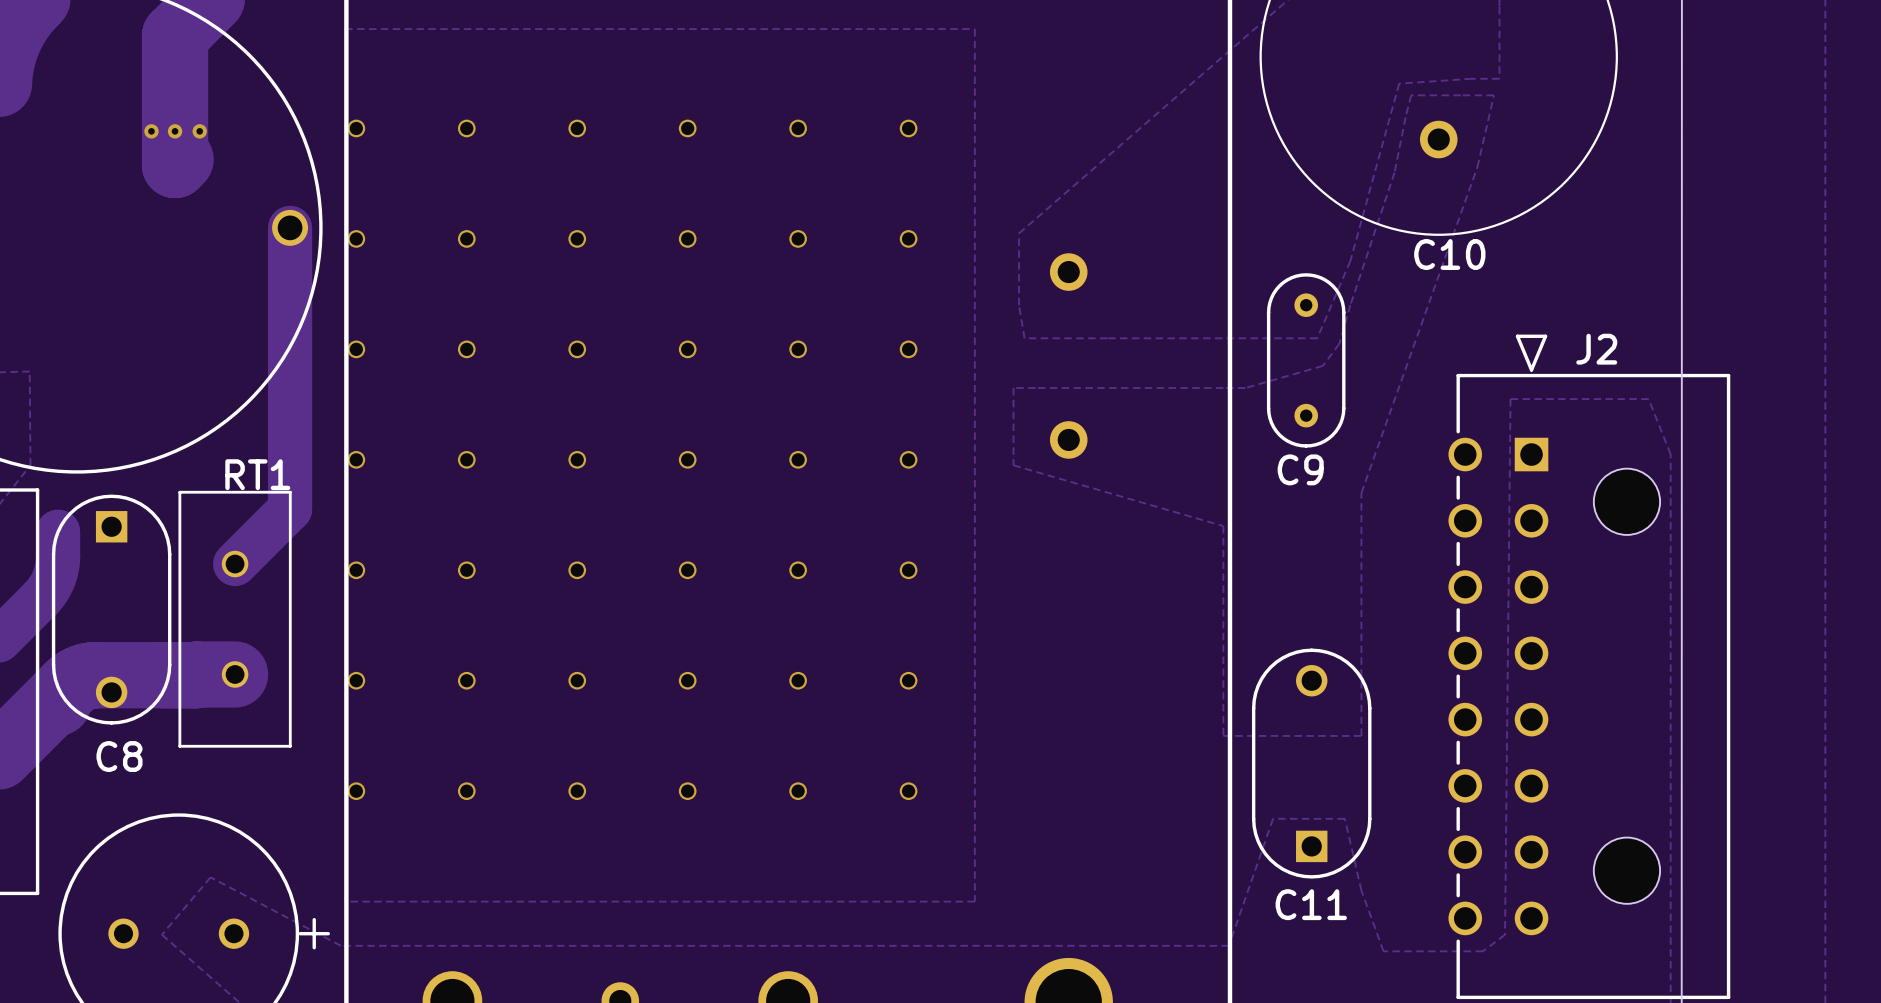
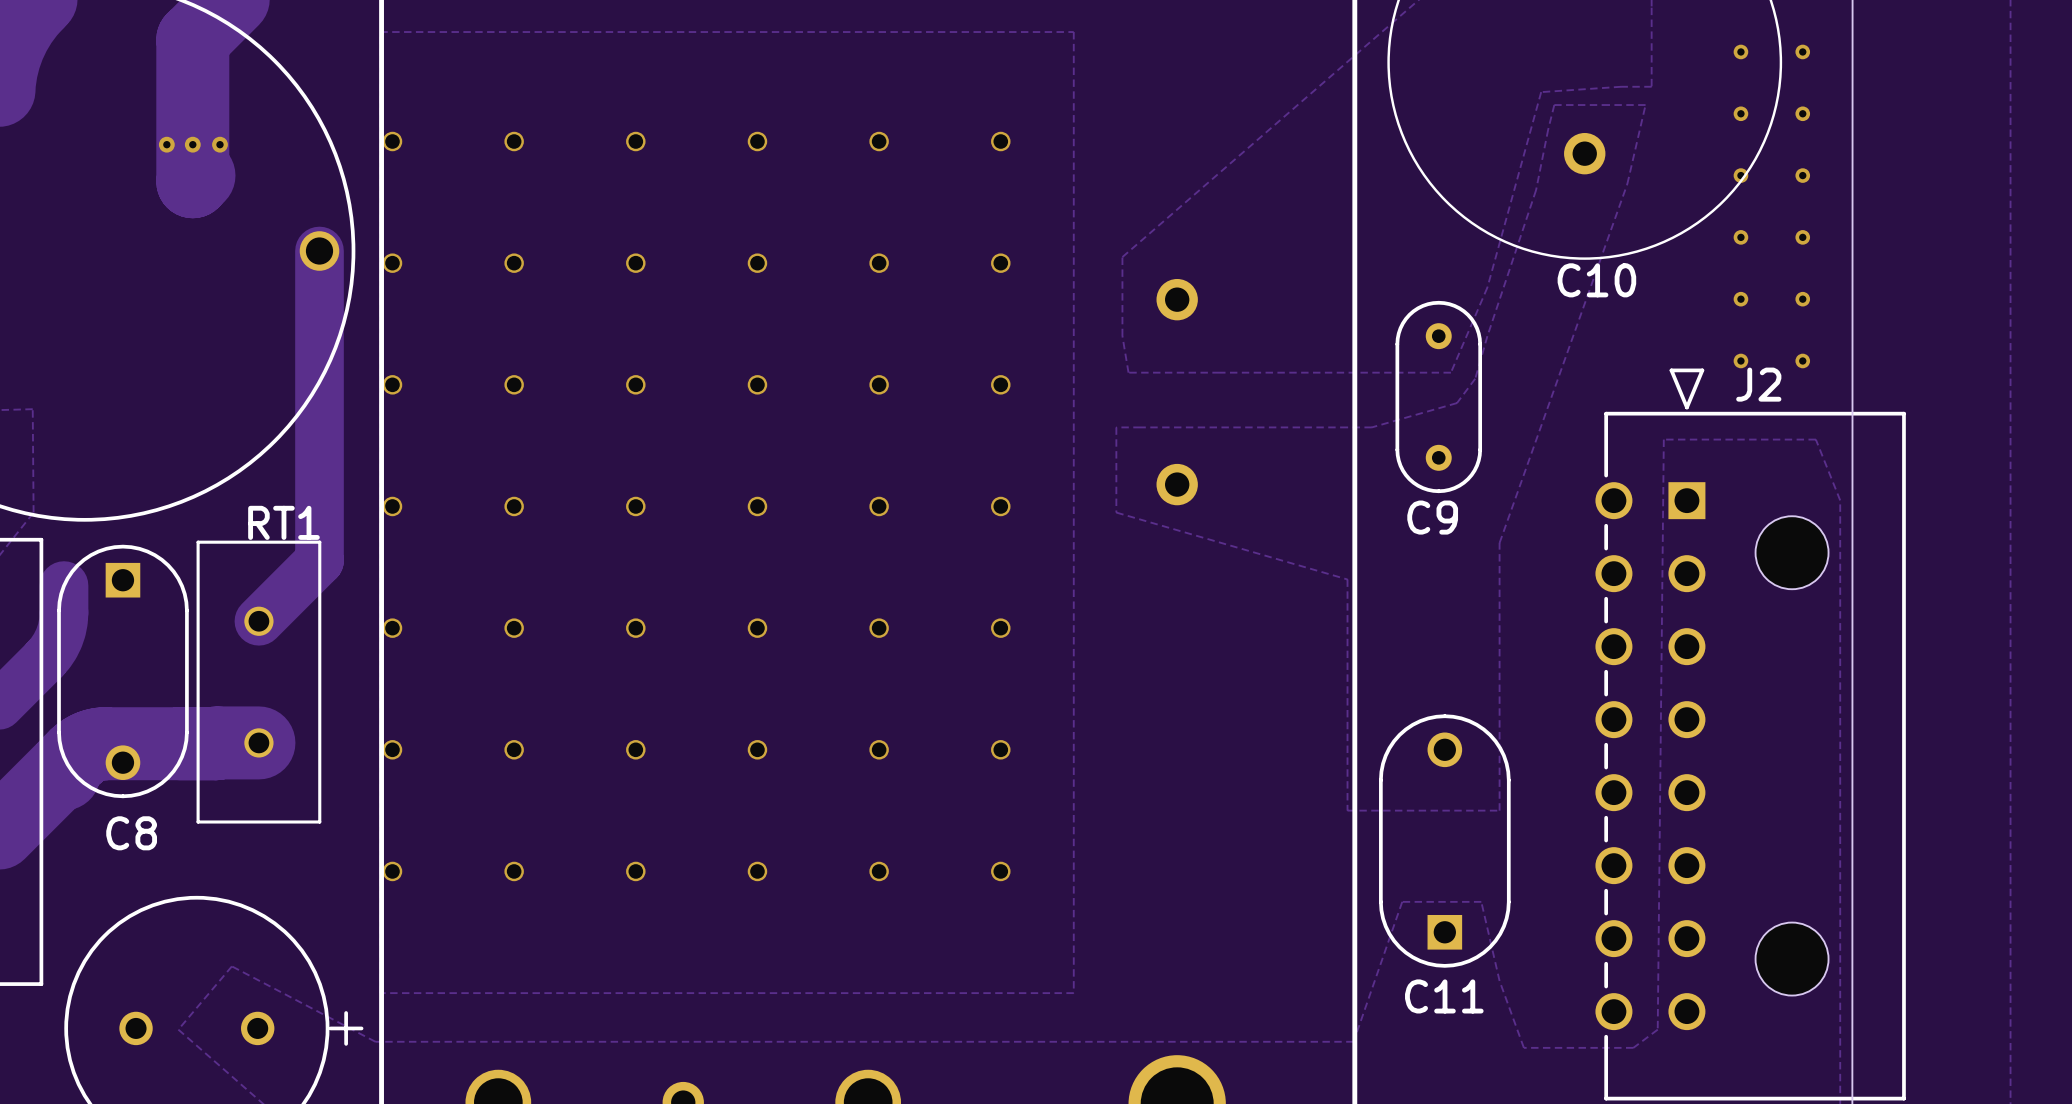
via: none -> (1740, 51)
via: none -> (1802, 51)
via: none -> (1740, 113)
via: none -> (1802, 113)
via: none -> (1740, 175)
via: none -> (1802, 175)
via: none -> (1740, 237)
via: none -> (1802, 237)
via: none -> (1740, 299)
via: none -> (1802, 299)
via: none -> (1740, 360)
via: none -> (1802, 360)

